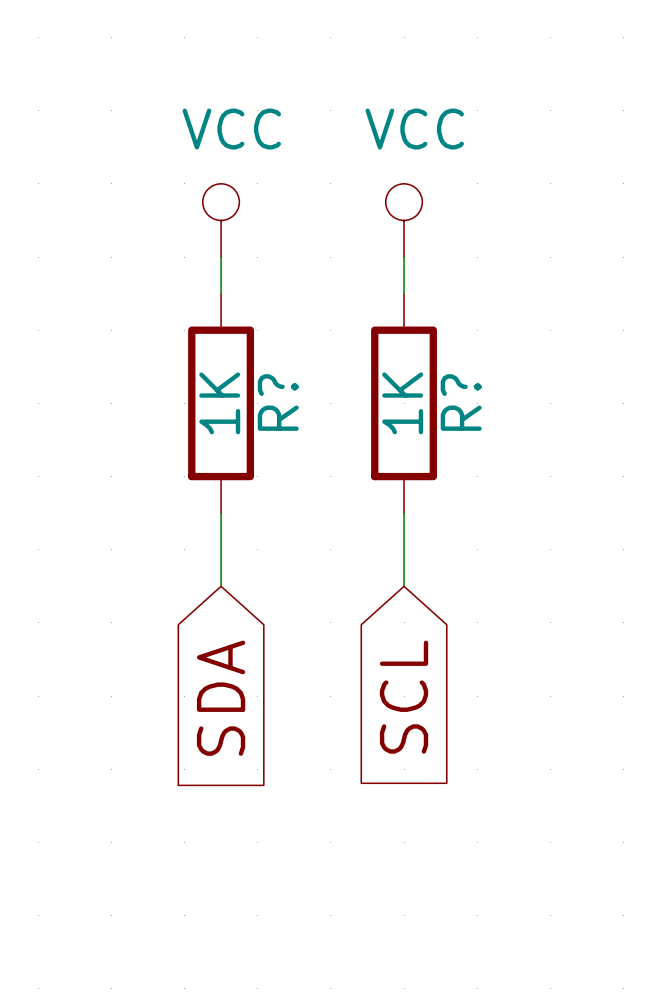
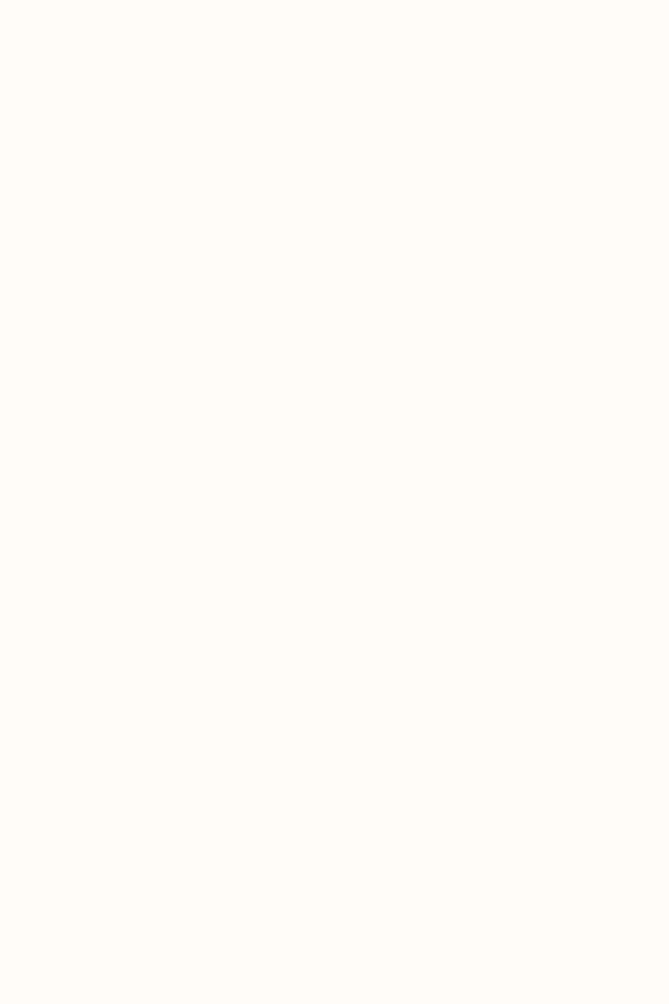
power symbol: VCC (221, 220) -> none
power symbol: VCC (404, 220) -> none
wire: (221, 257) (221, 293) -> none
wire: (404, 257) (404, 293) -> none
R?: 1K (221, 403) -> none
R?: 1K (404, 403) -> none
wire: (221, 513) (221, 586) -> none
wire: (404, 513) (404, 586) -> none
global label: SCL (404, 697) -> none
global label: SDA (221, 698) -> none

